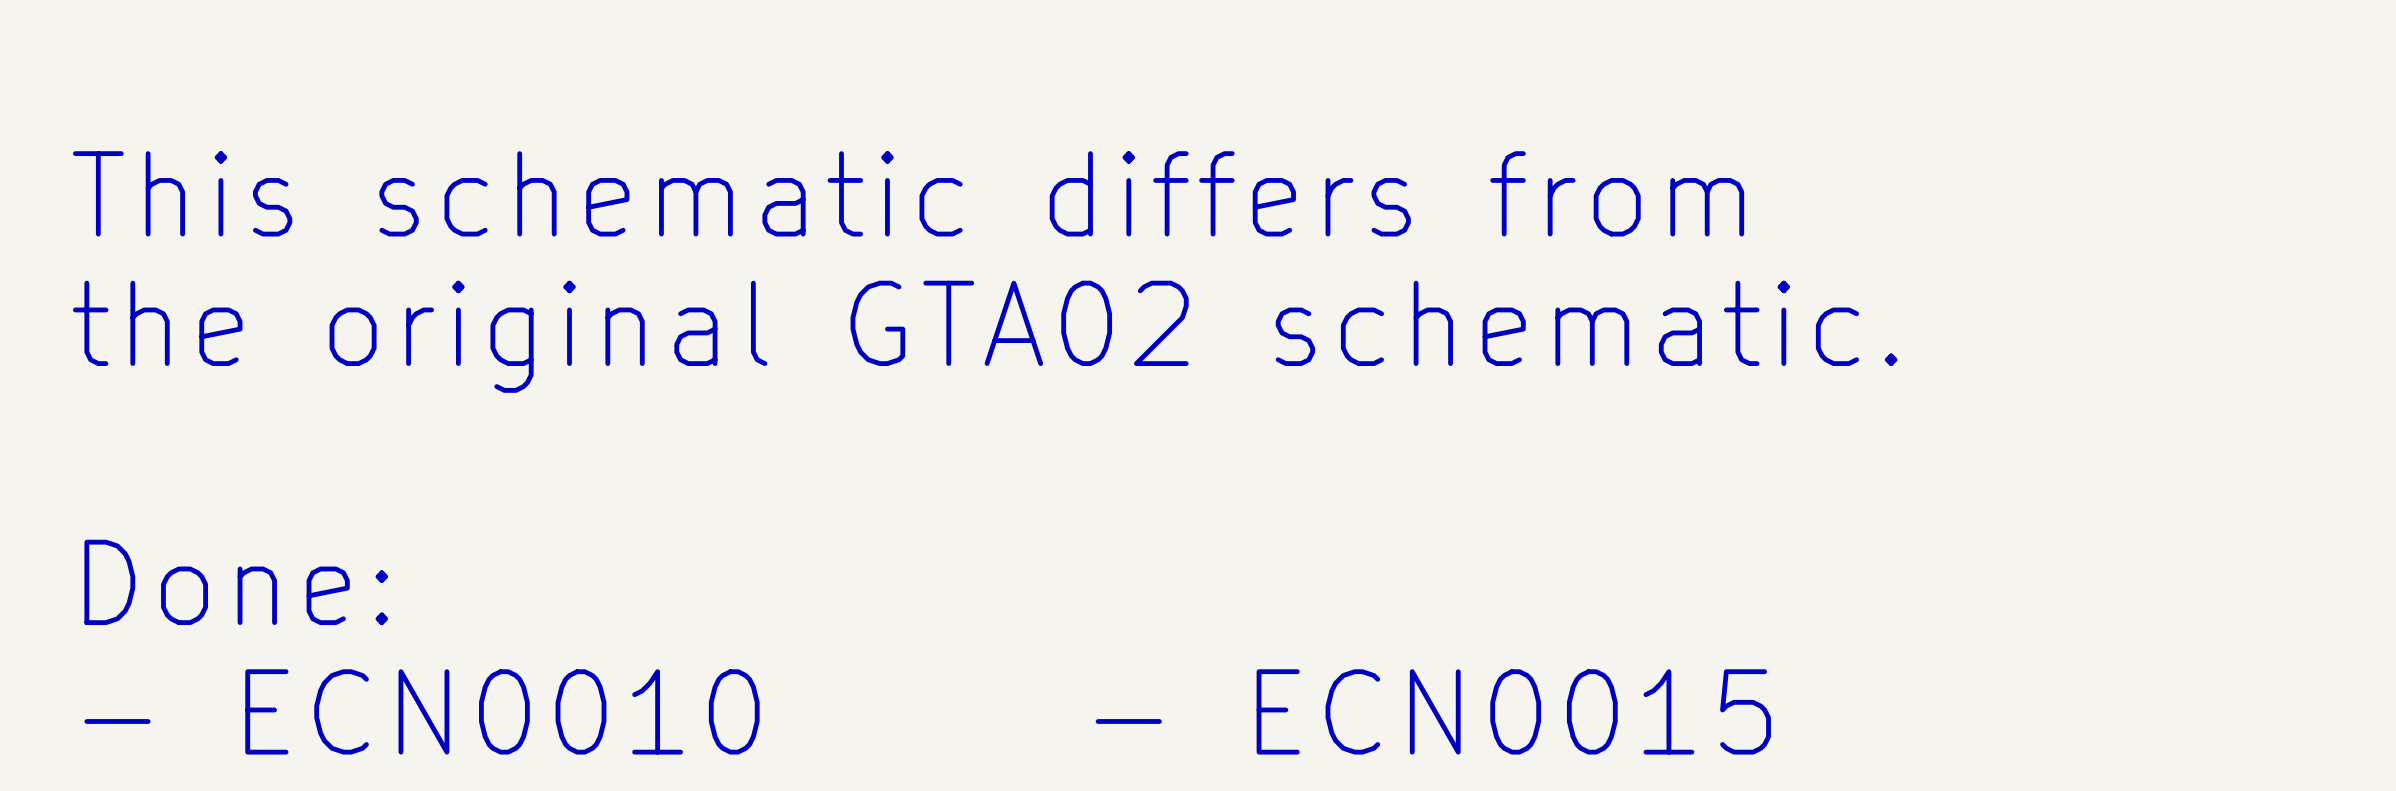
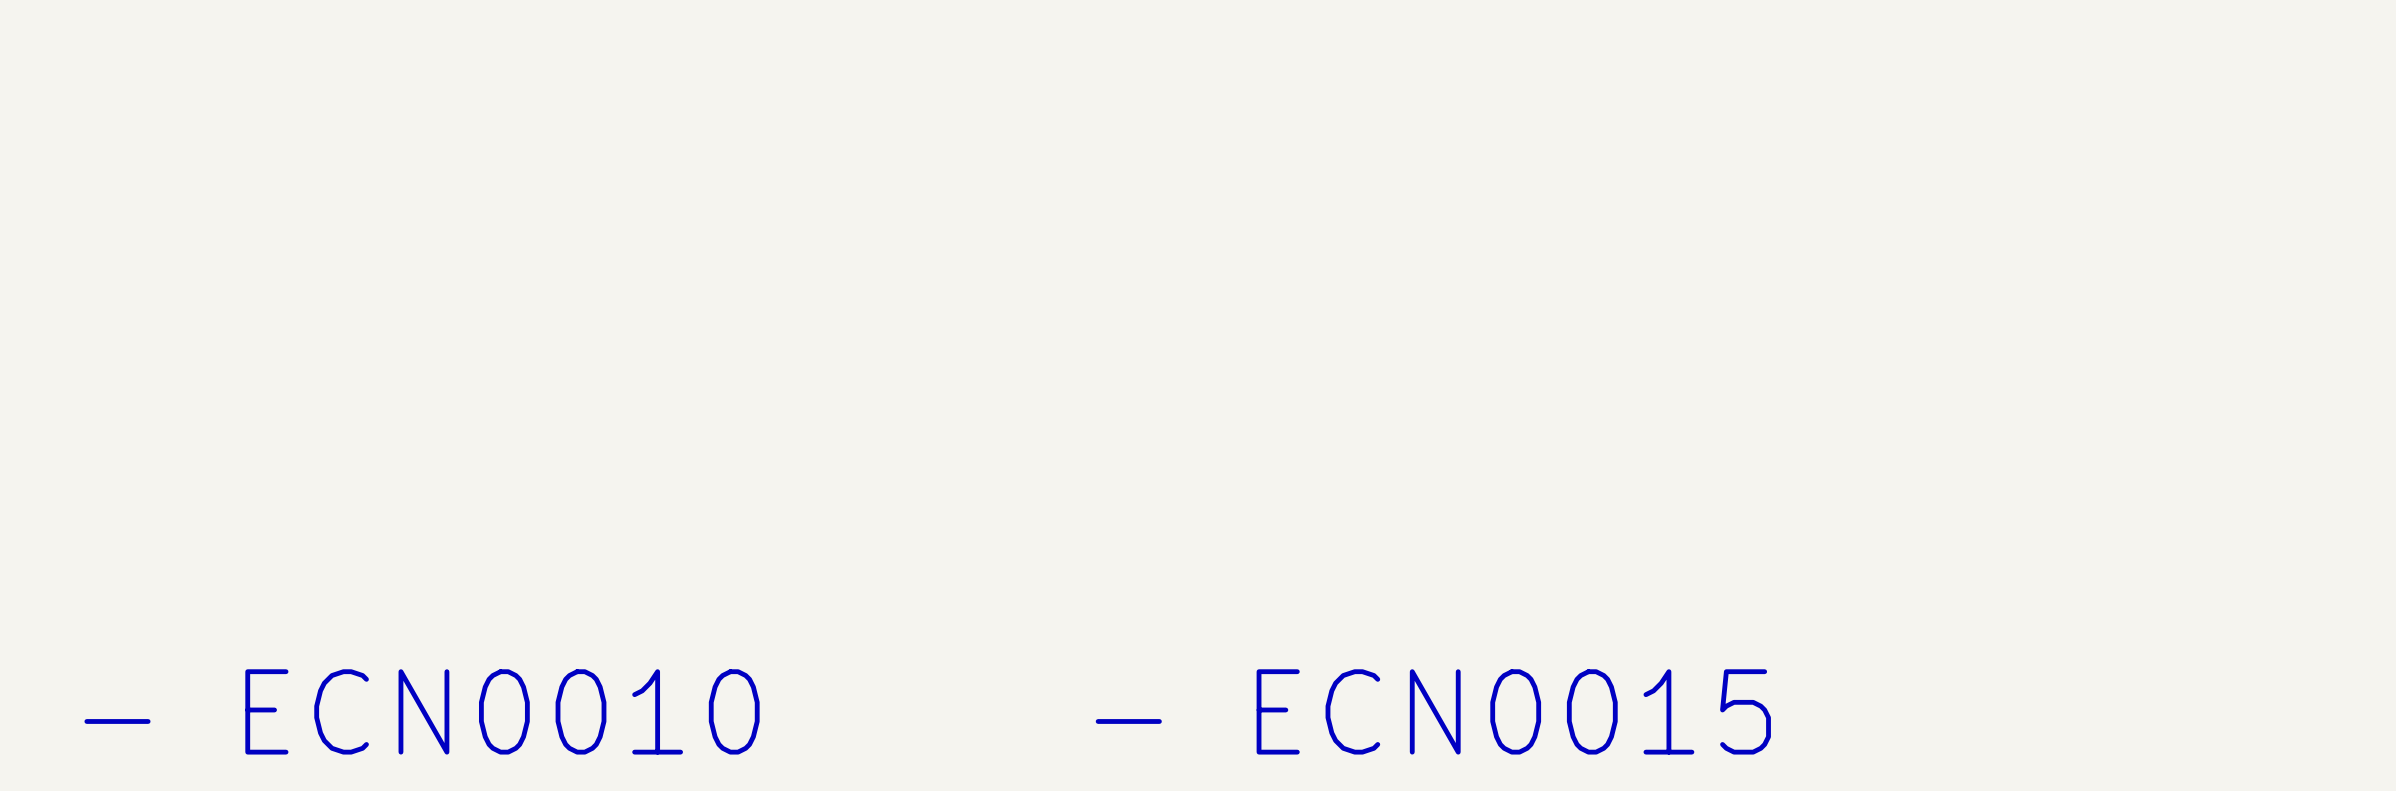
text: This schematic differs from (908, 193) -> none
text: the original GTA02 schematic. (985, 336) -> none
text: Done: (236, 582) -> none

